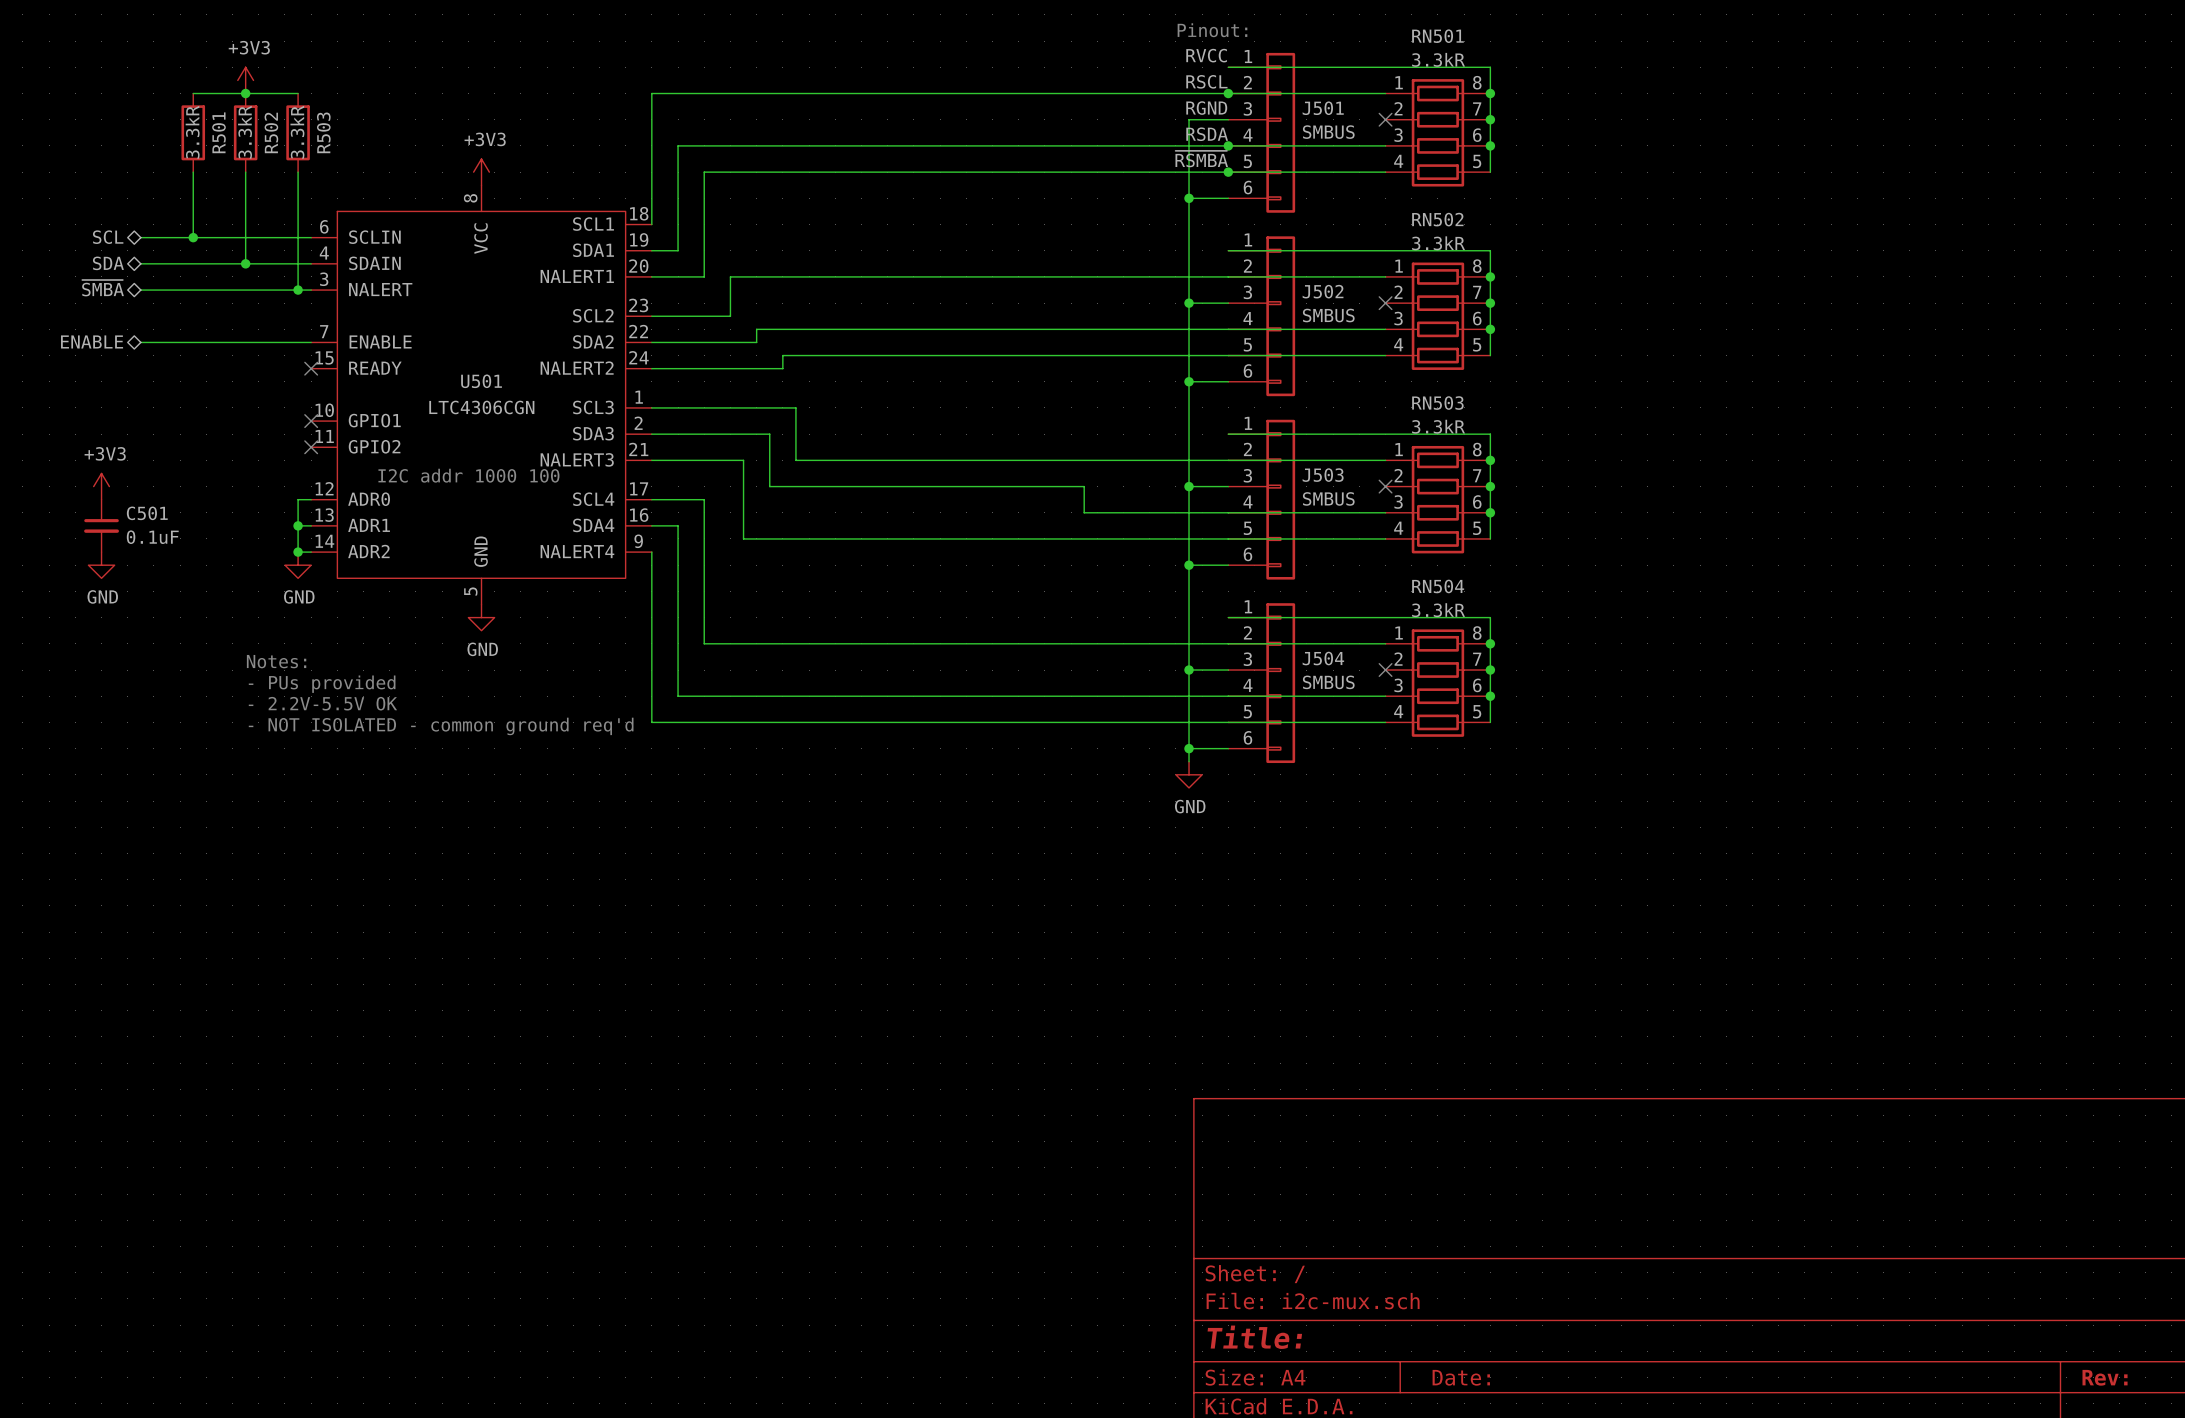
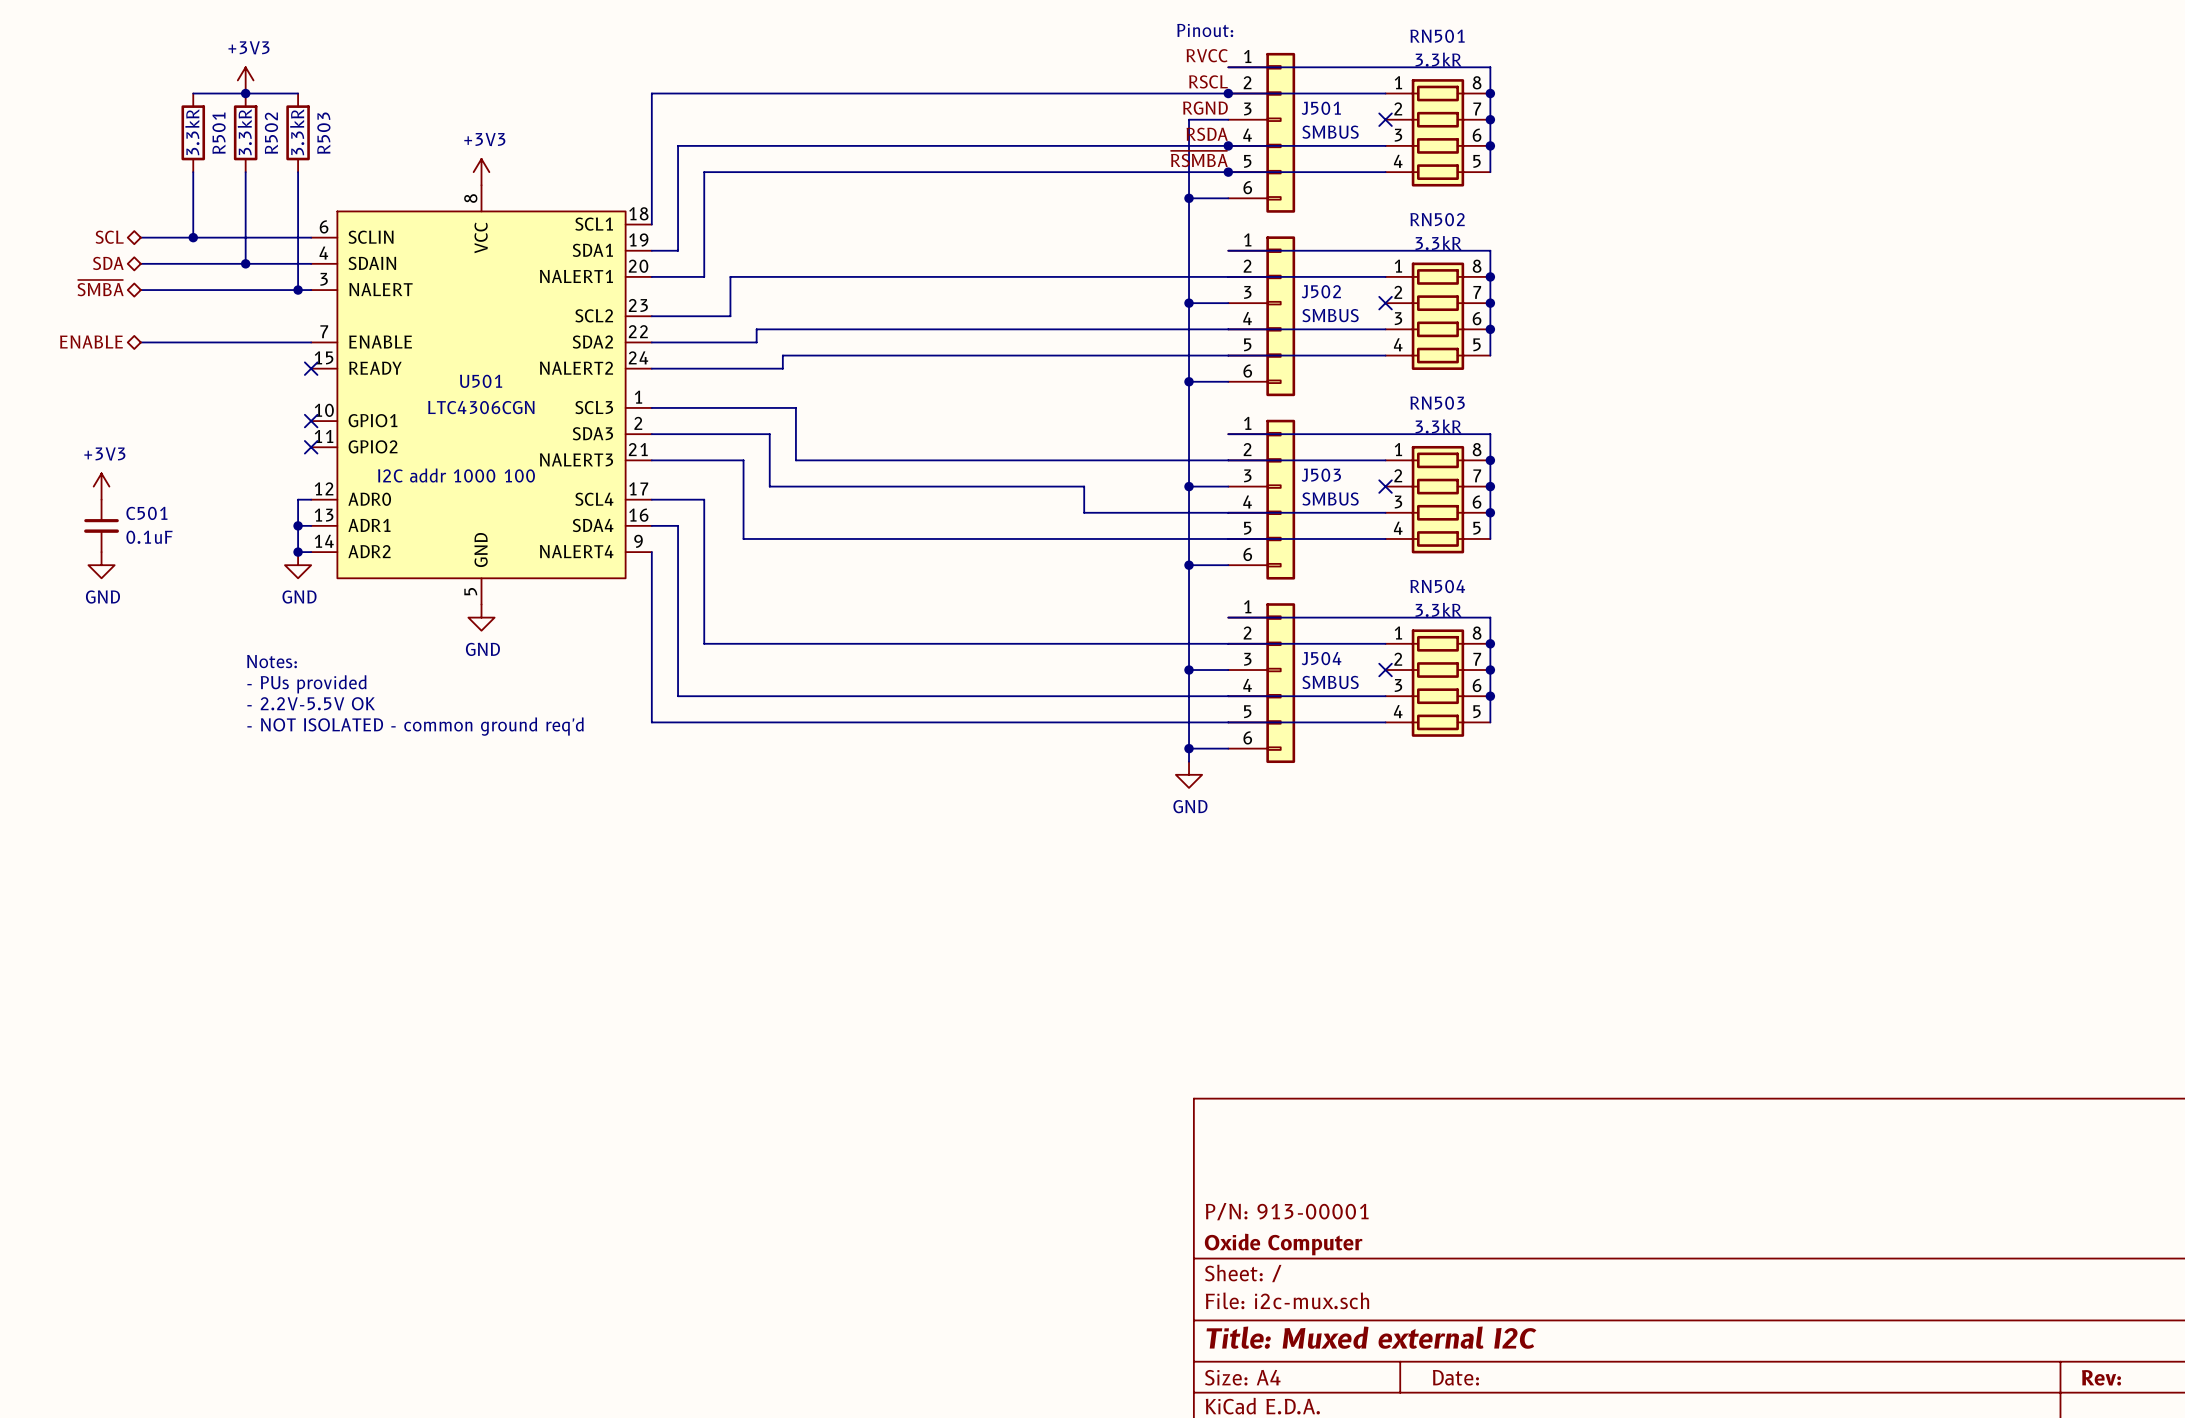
title block: none -> P/N: 913-00001 (1287, 1211)
title block: none -> Oxide Computer (1283, 1244)
title block: Title: (1254, 1337) -> Title: Muxed external I2C (1371, 1337)

